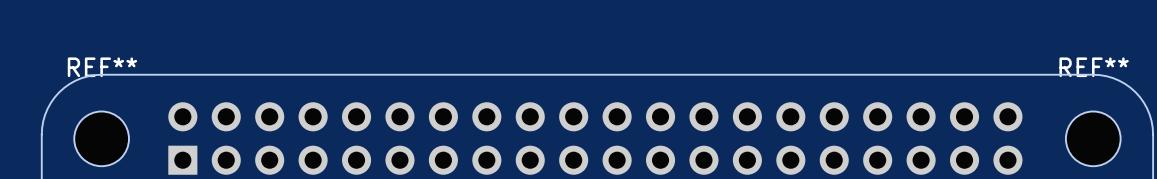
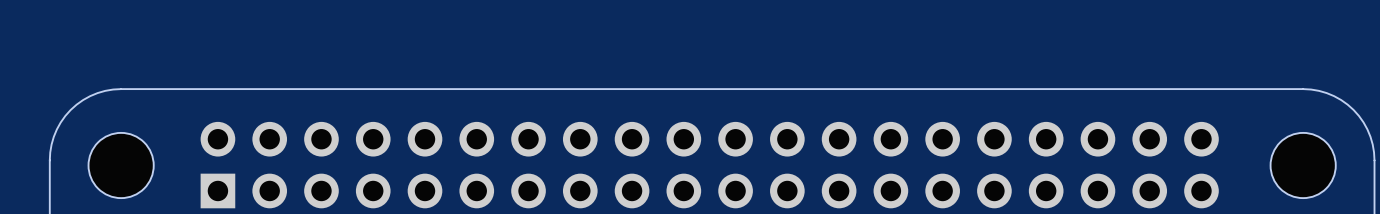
REF** name: REF** (102, 67) -> none
REF** name: REF** (1094, 67) -> none

